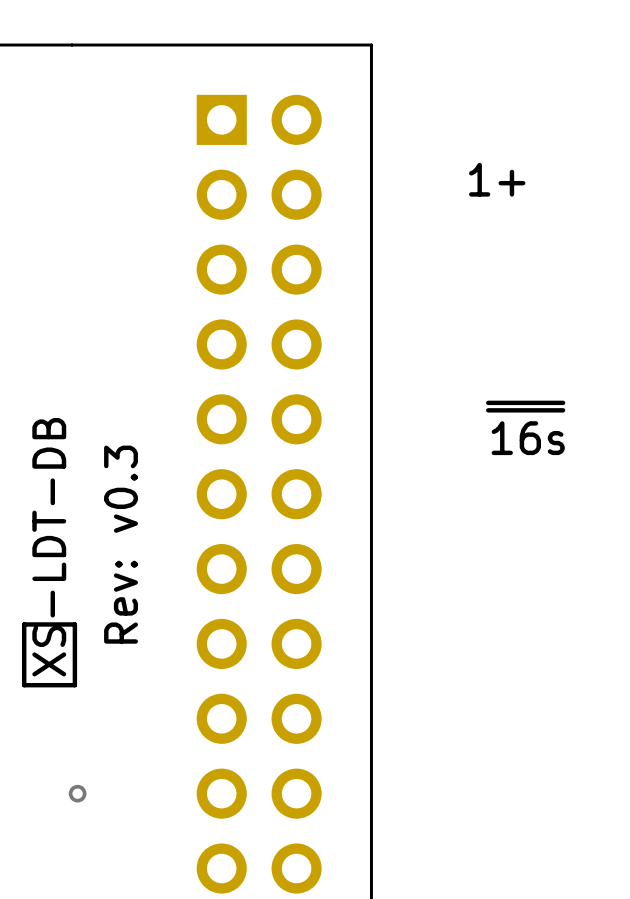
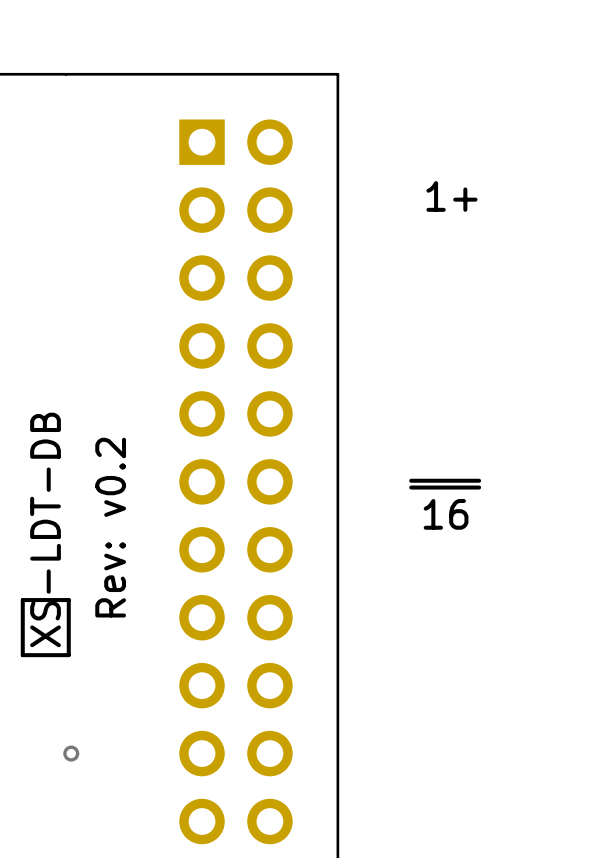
line: (488, 402) (563, 402) -> (411, 480) (479, 480)
line: (488, 410) (563, 410) -> (411, 487) (479, 487)
text: 16s (528, 438) -> none
text: none -> 16 (446, 514)
text: Rev: v0.3 (121, 544) -> Rev: v0.2 (110, 527)

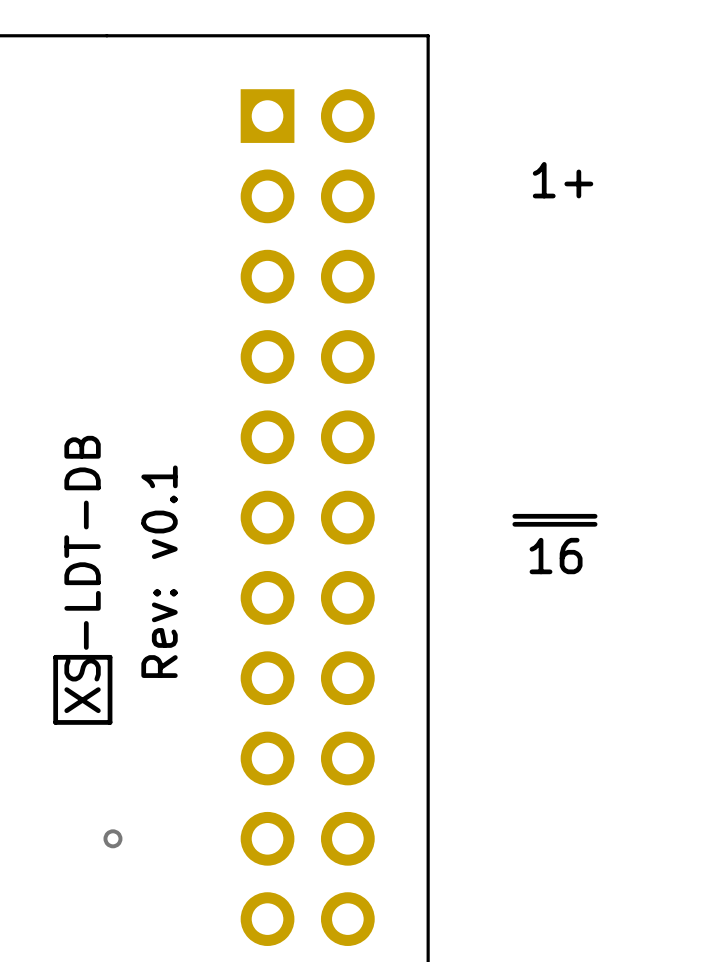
text: Rev: v0.2 (110, 527) -> Rev: v0.1 (159, 571)

